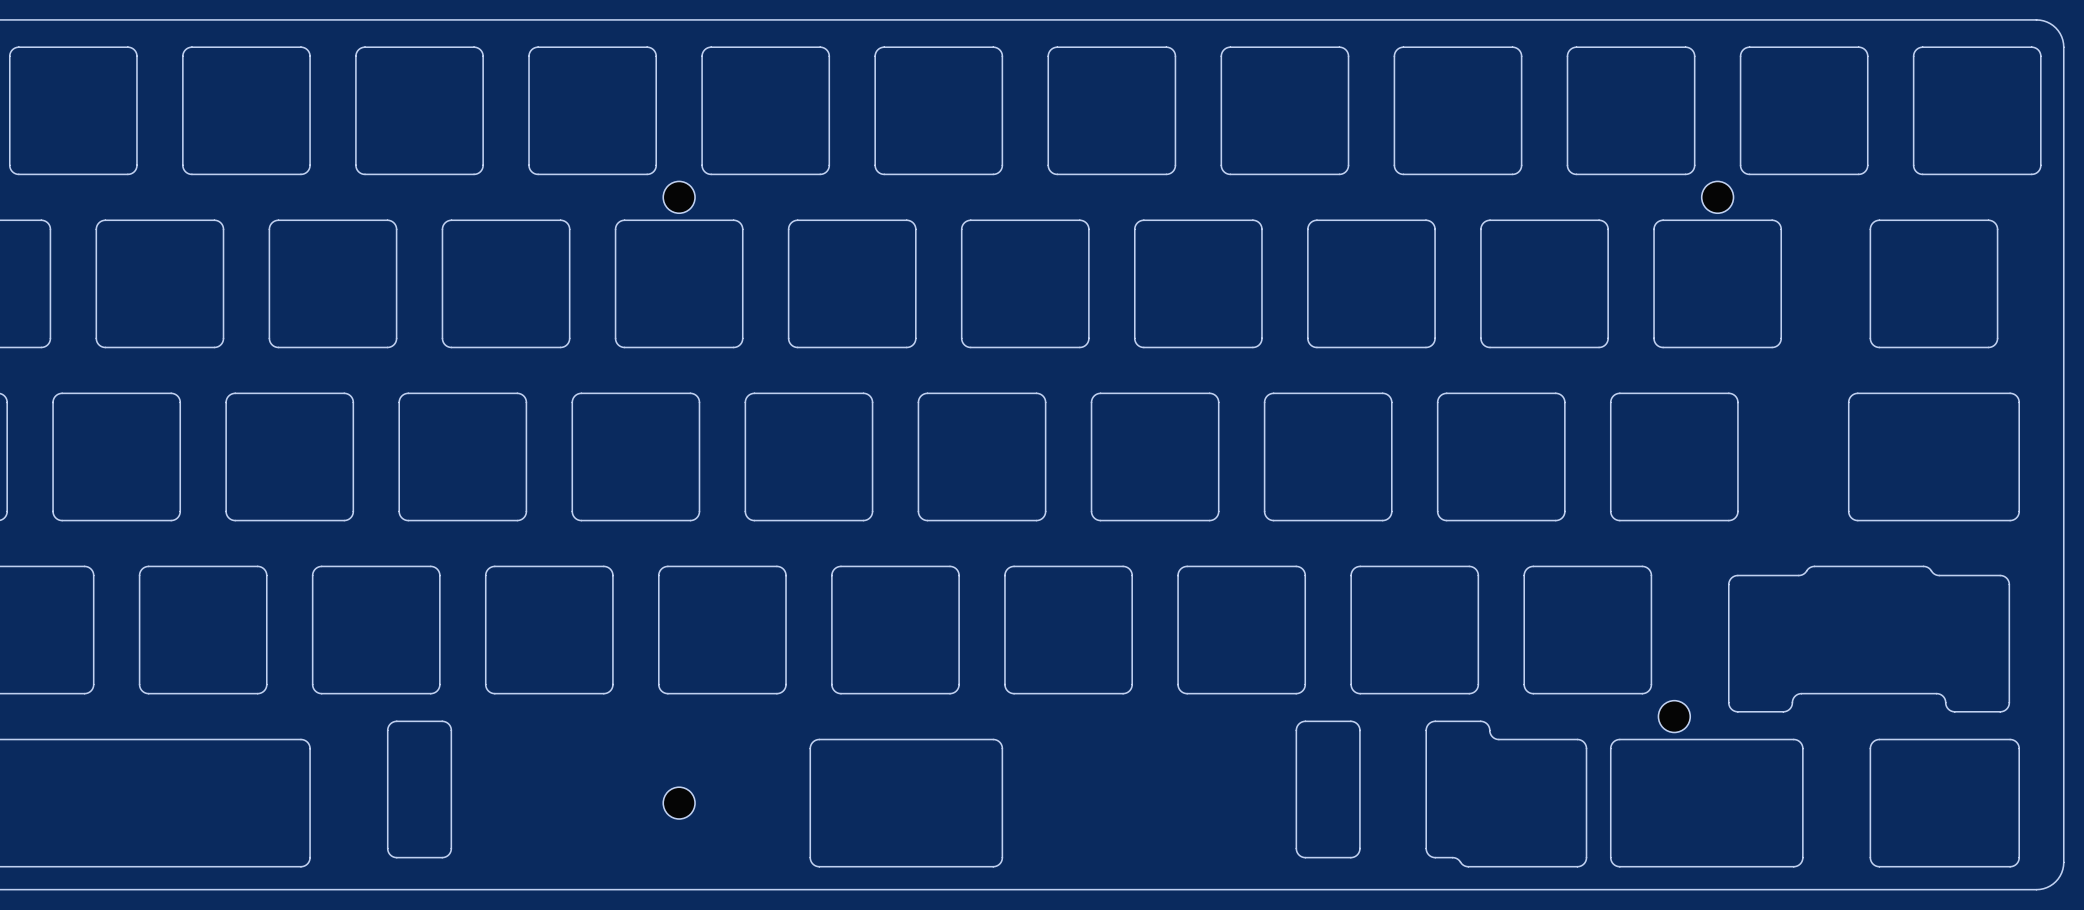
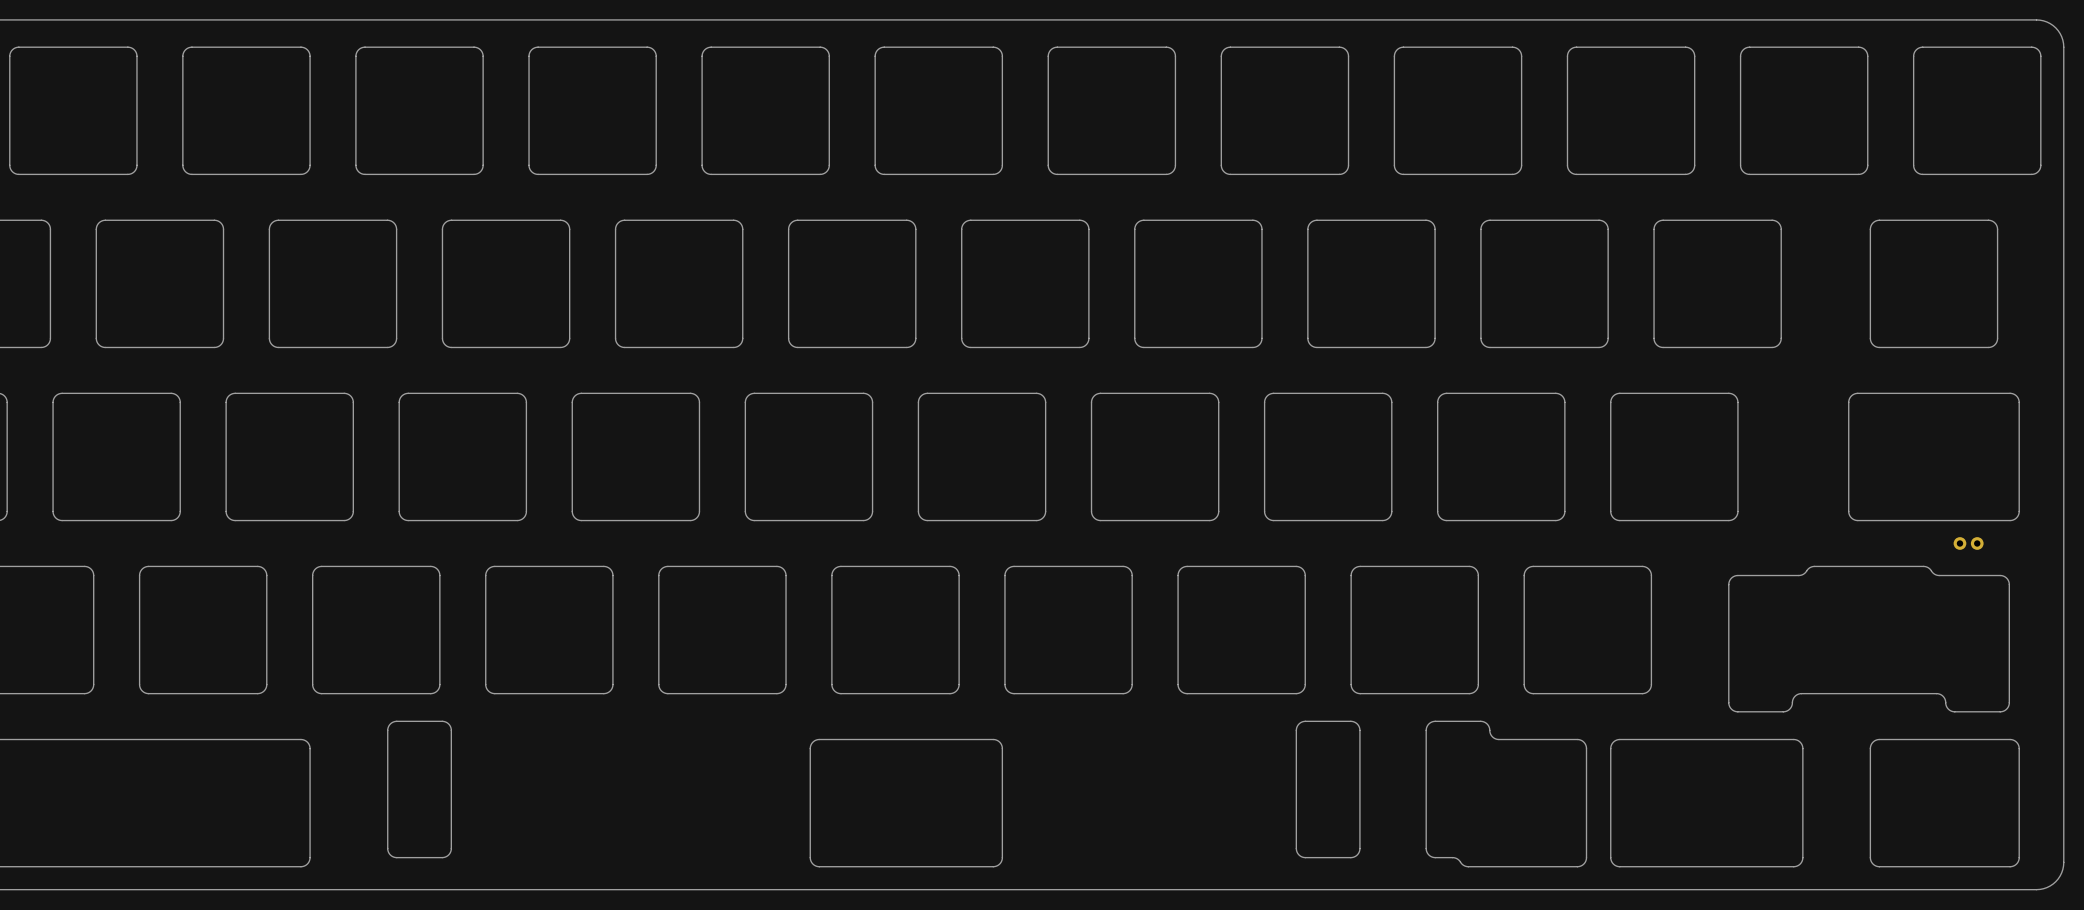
part: (679, 197) -> none
part: (1717, 197) -> none
part: none -> (1968, 543)
part: (1674, 716) -> none
part: (679, 803) -> none

